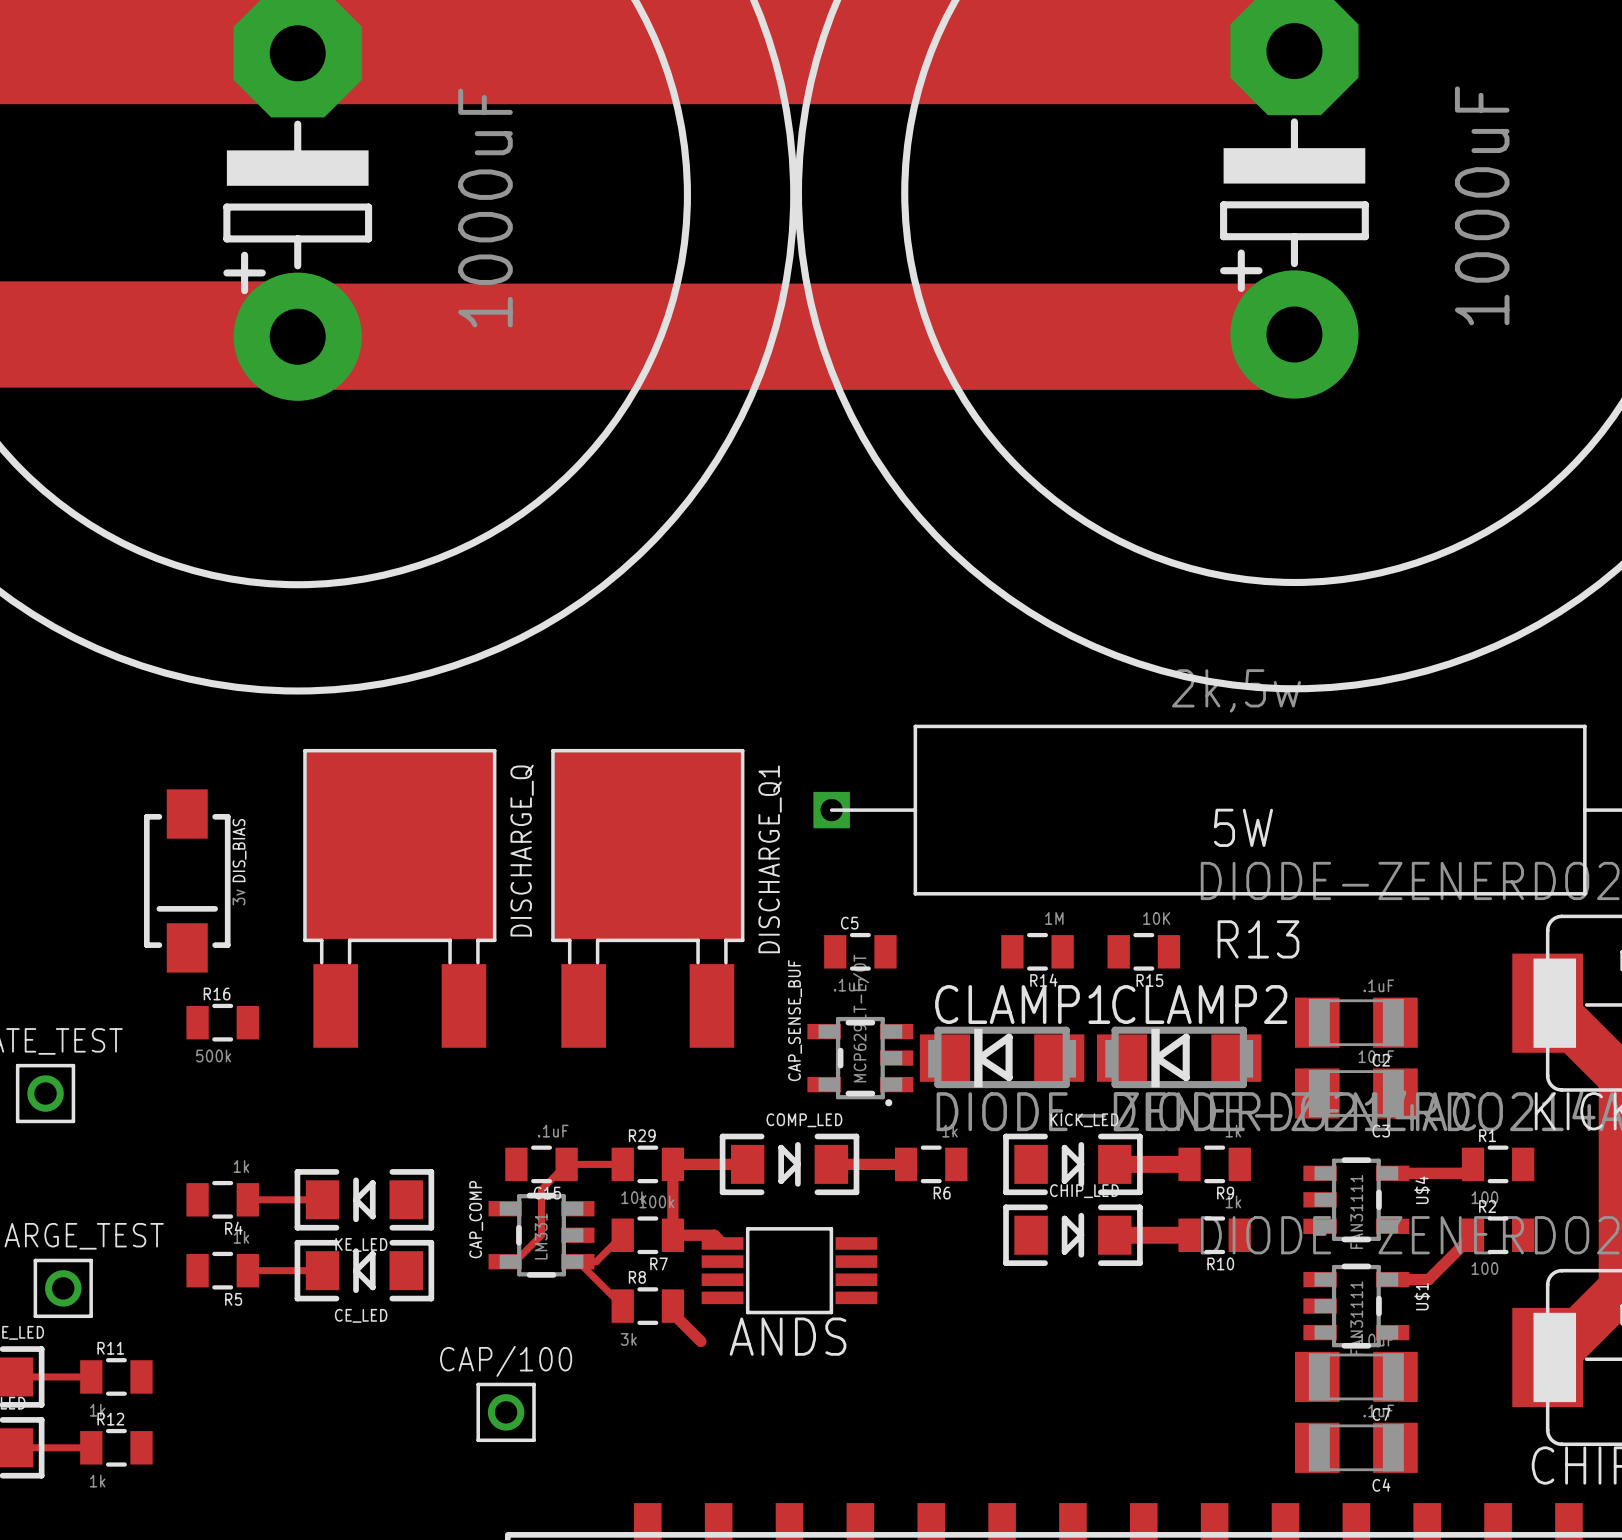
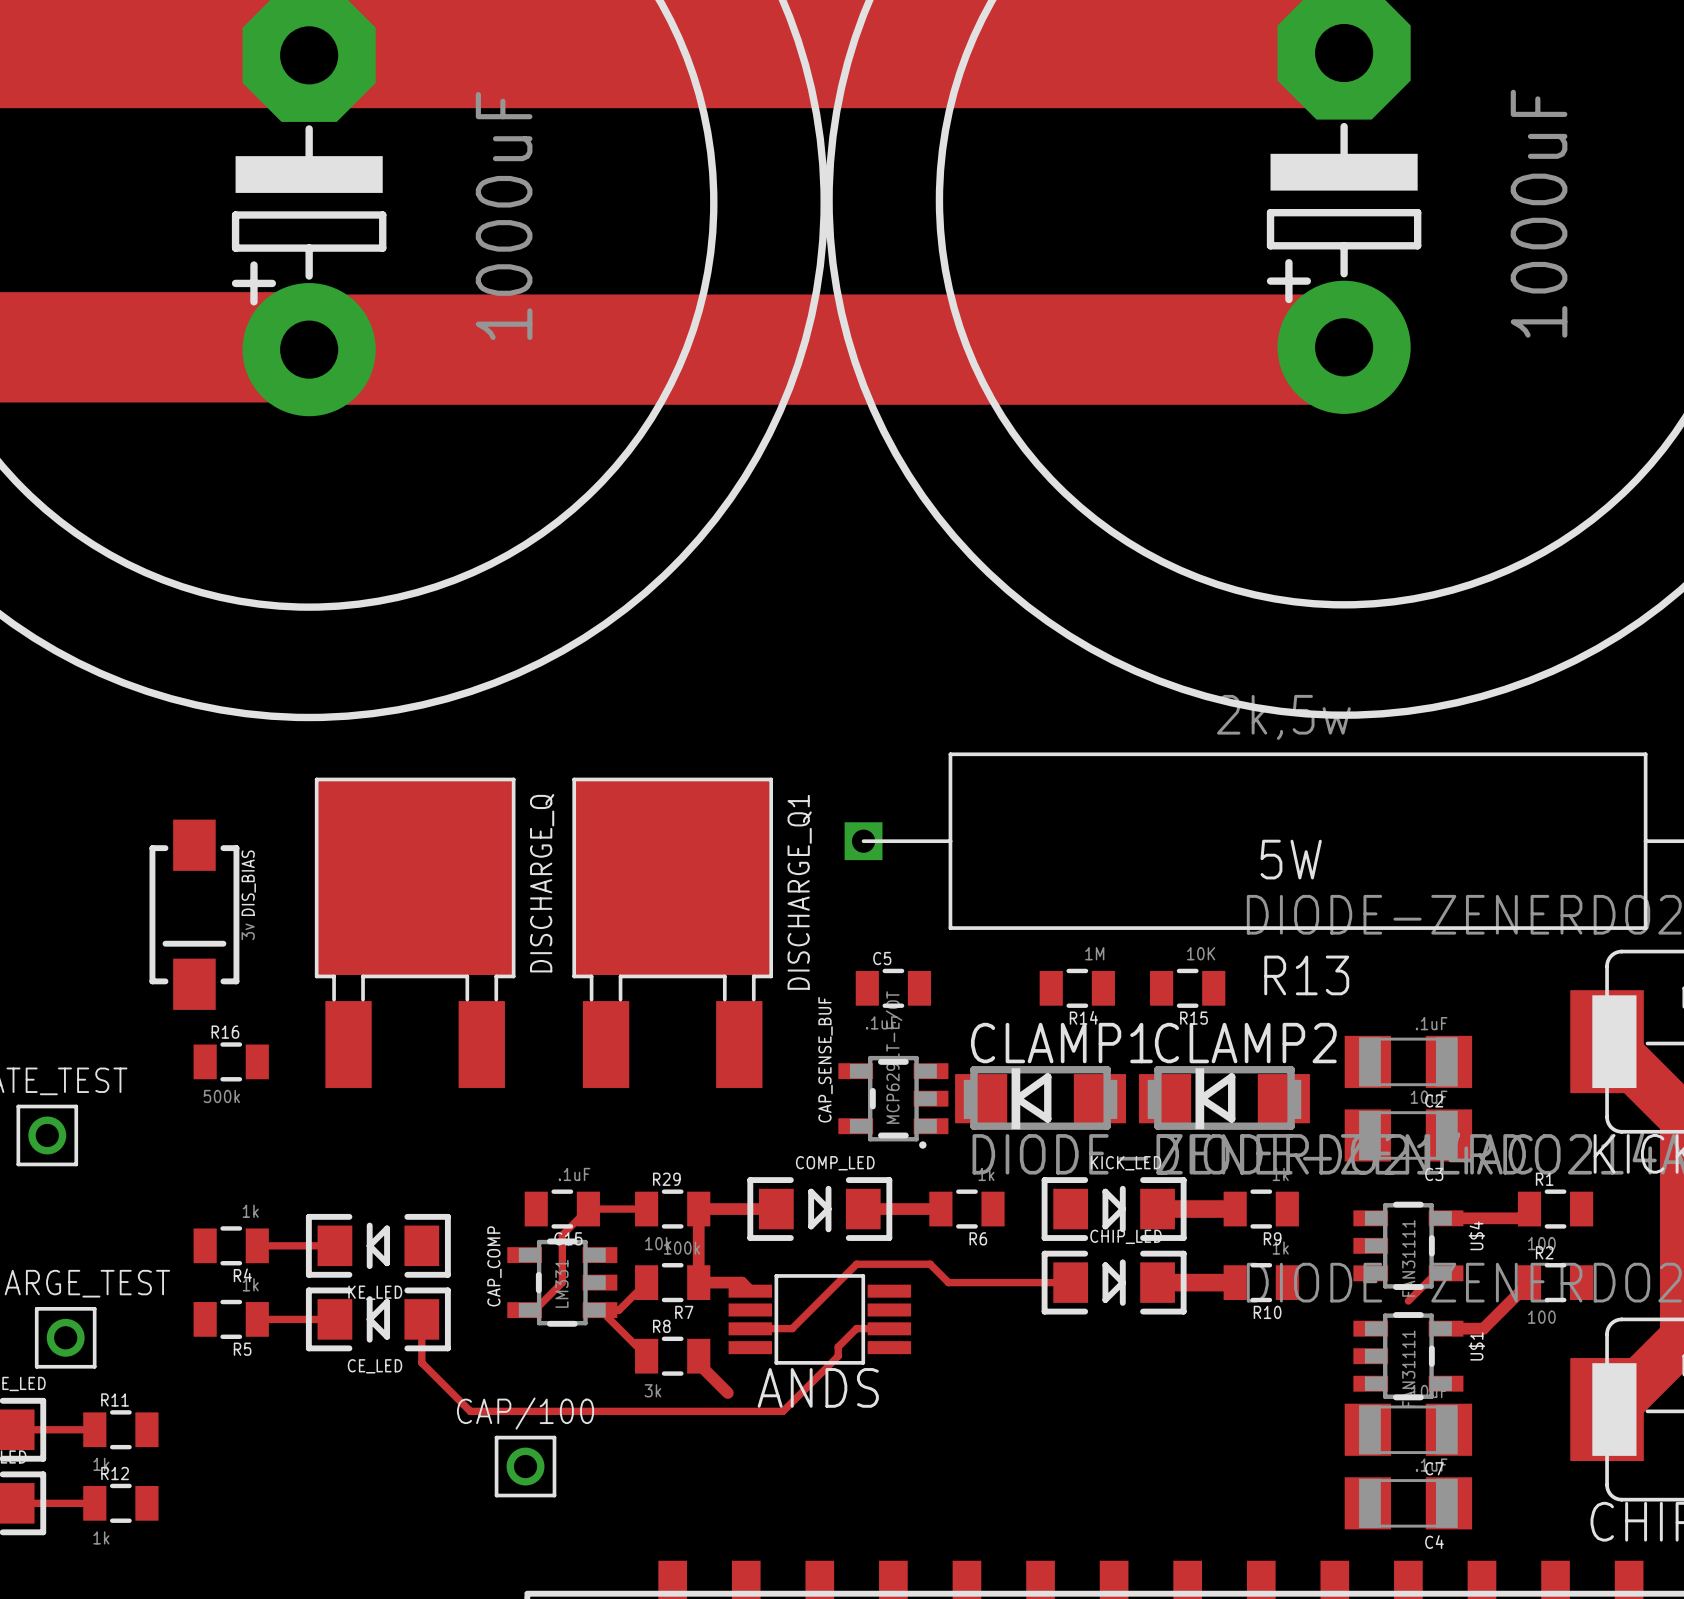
track: none -> (1446, 1273) (1436, 1273) (1408, 1301)
track: none -> (1070, 1282) (948, 1282) (930, 1264) (856, 1264) (792, 1328) (750, 1328)
track: none -> (421, 1319) (421, 1362) (470, 1411) (783, 1411) (838, 1356) (838, 1346) (856, 1328) (889, 1328)

